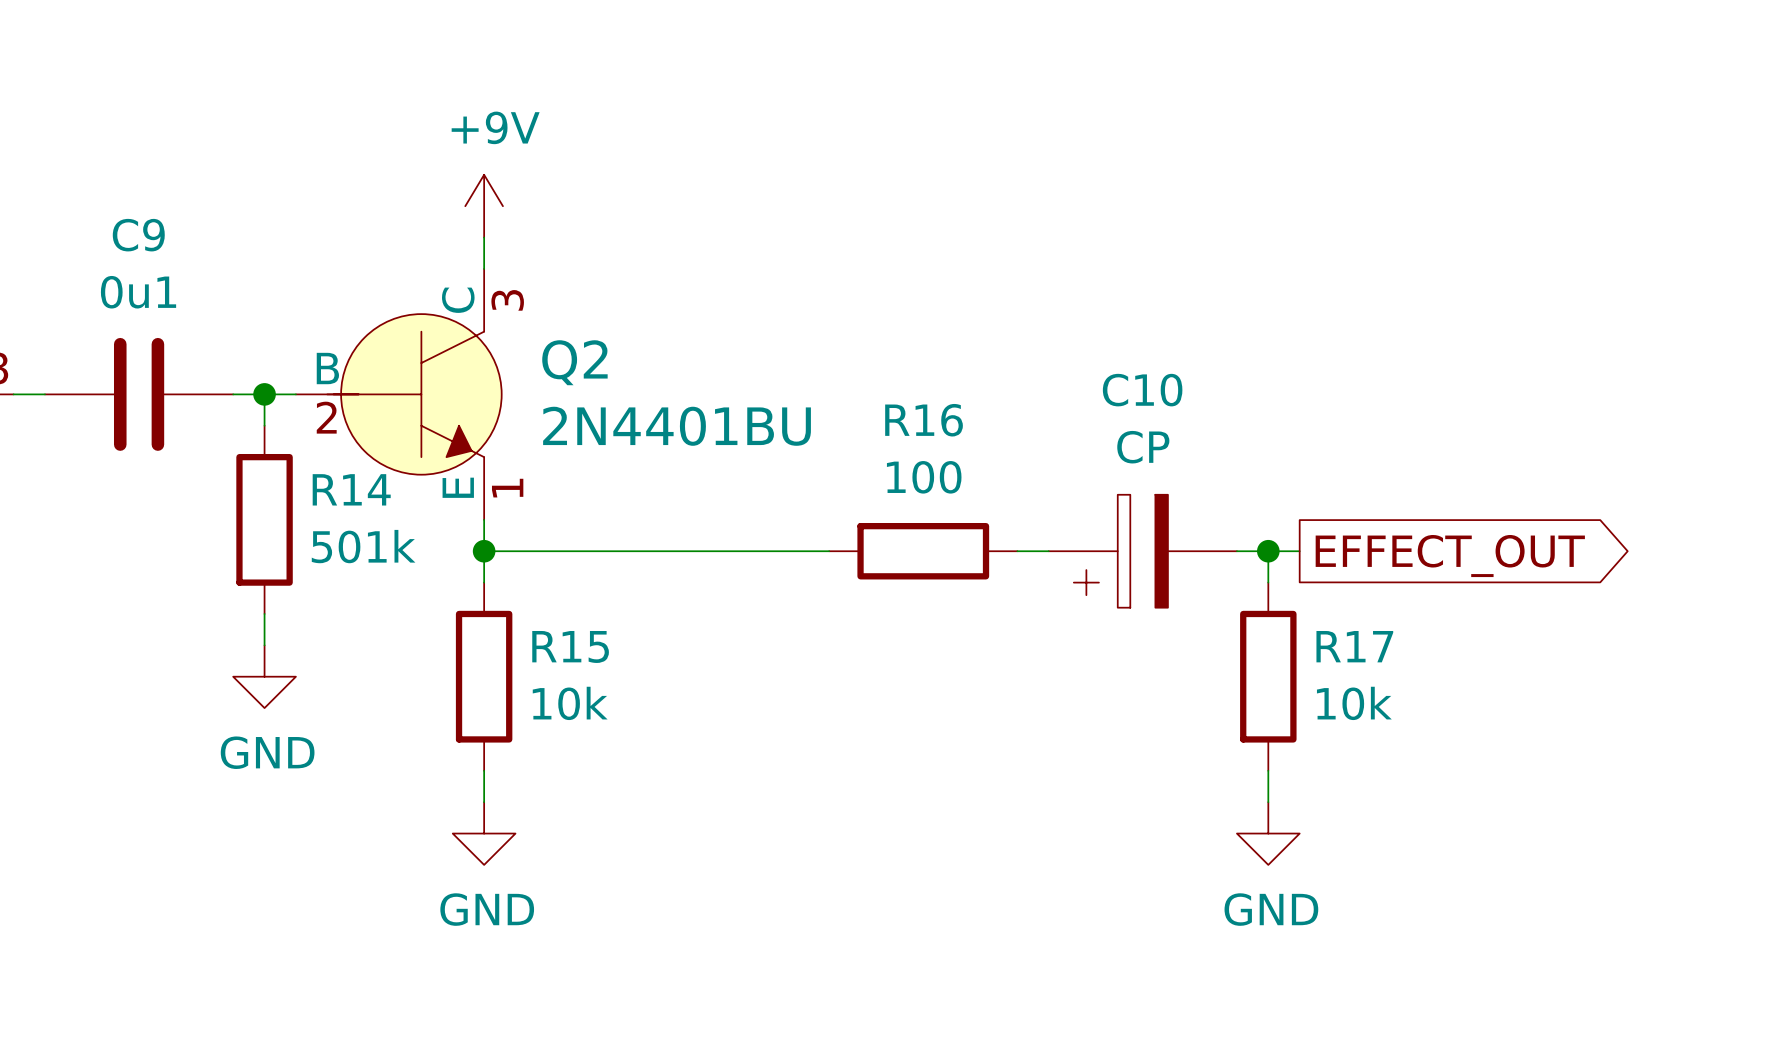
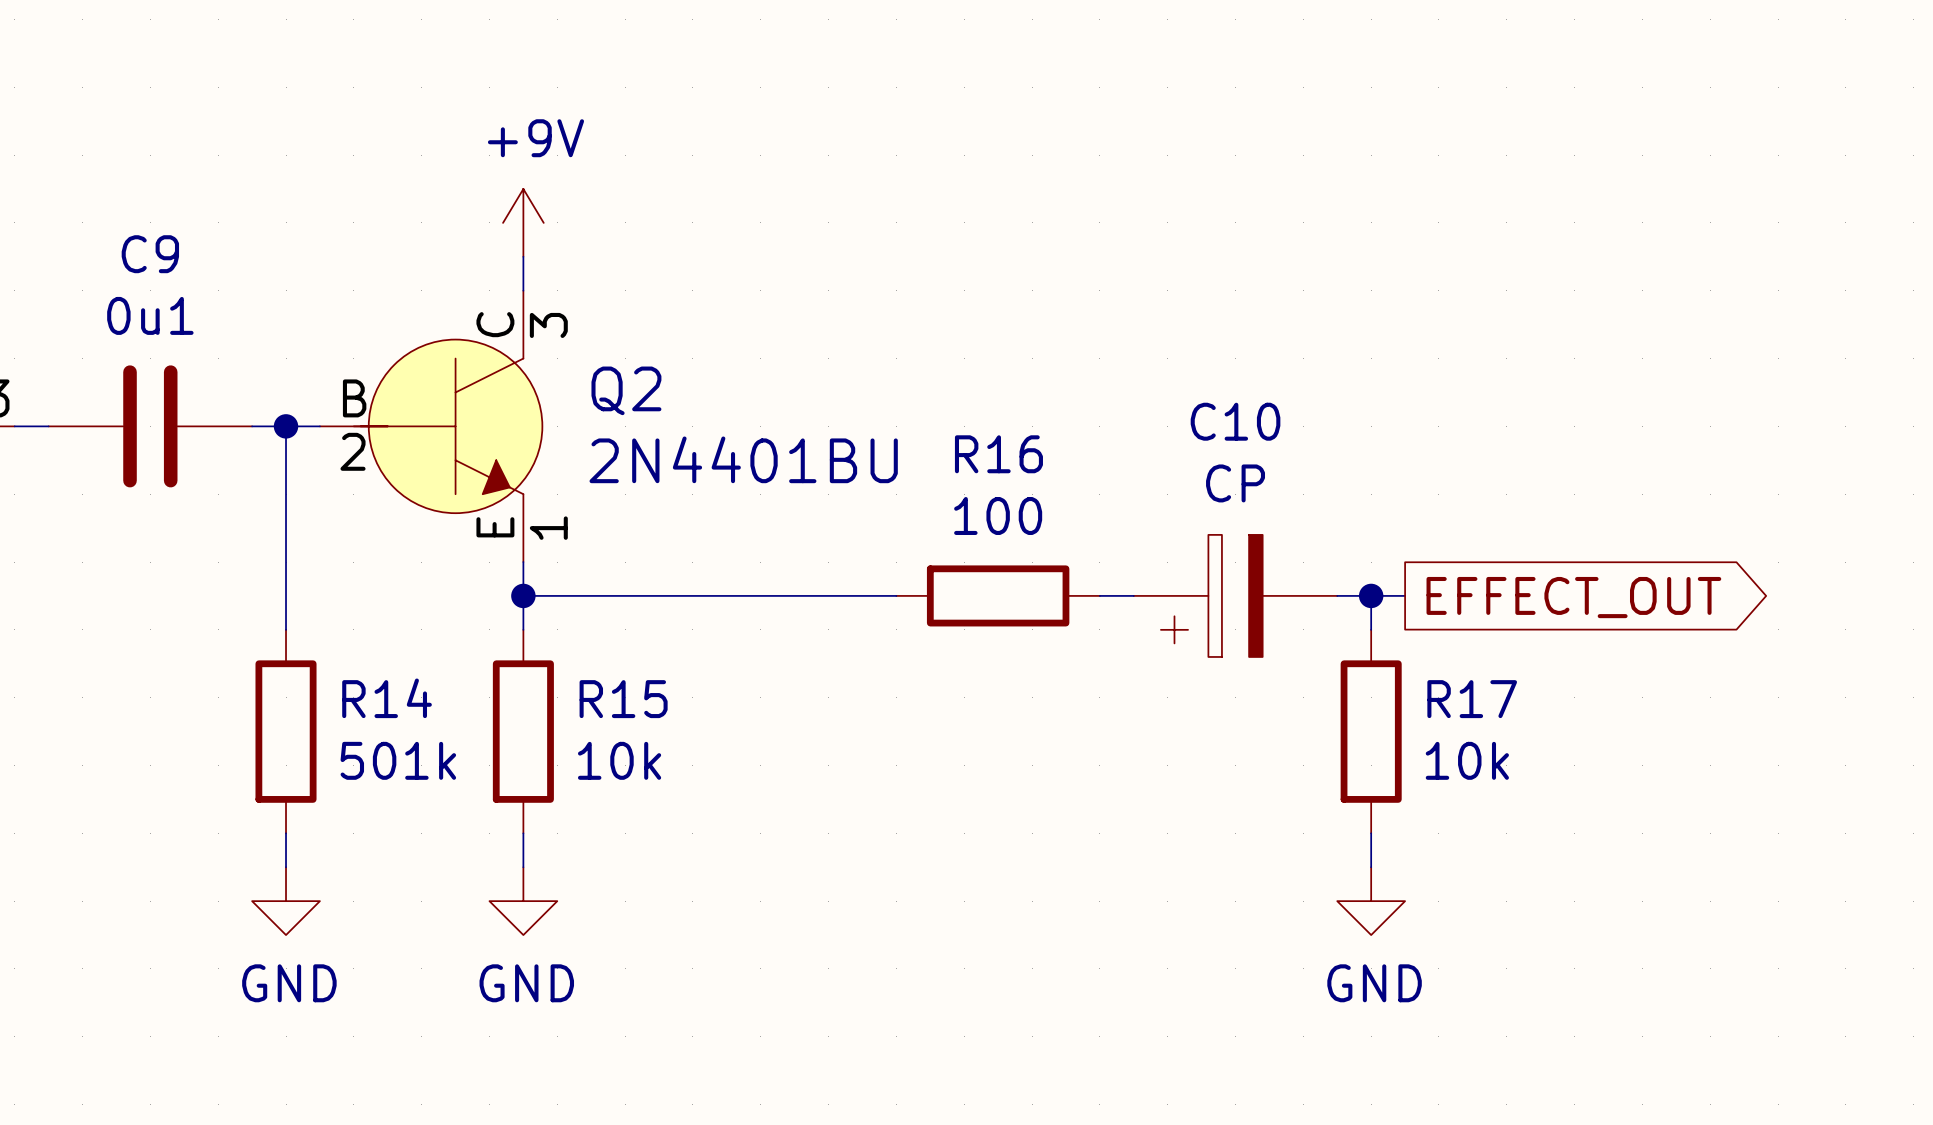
wire: none -> (286, 460) (286, 629)
R14 position: (264, 519) -> (286, 731)
wire: (264, 613) (264, 645) -> (286, 833) (286, 867)
power symbol position: GND (264, 676) -> GND (286, 901)

